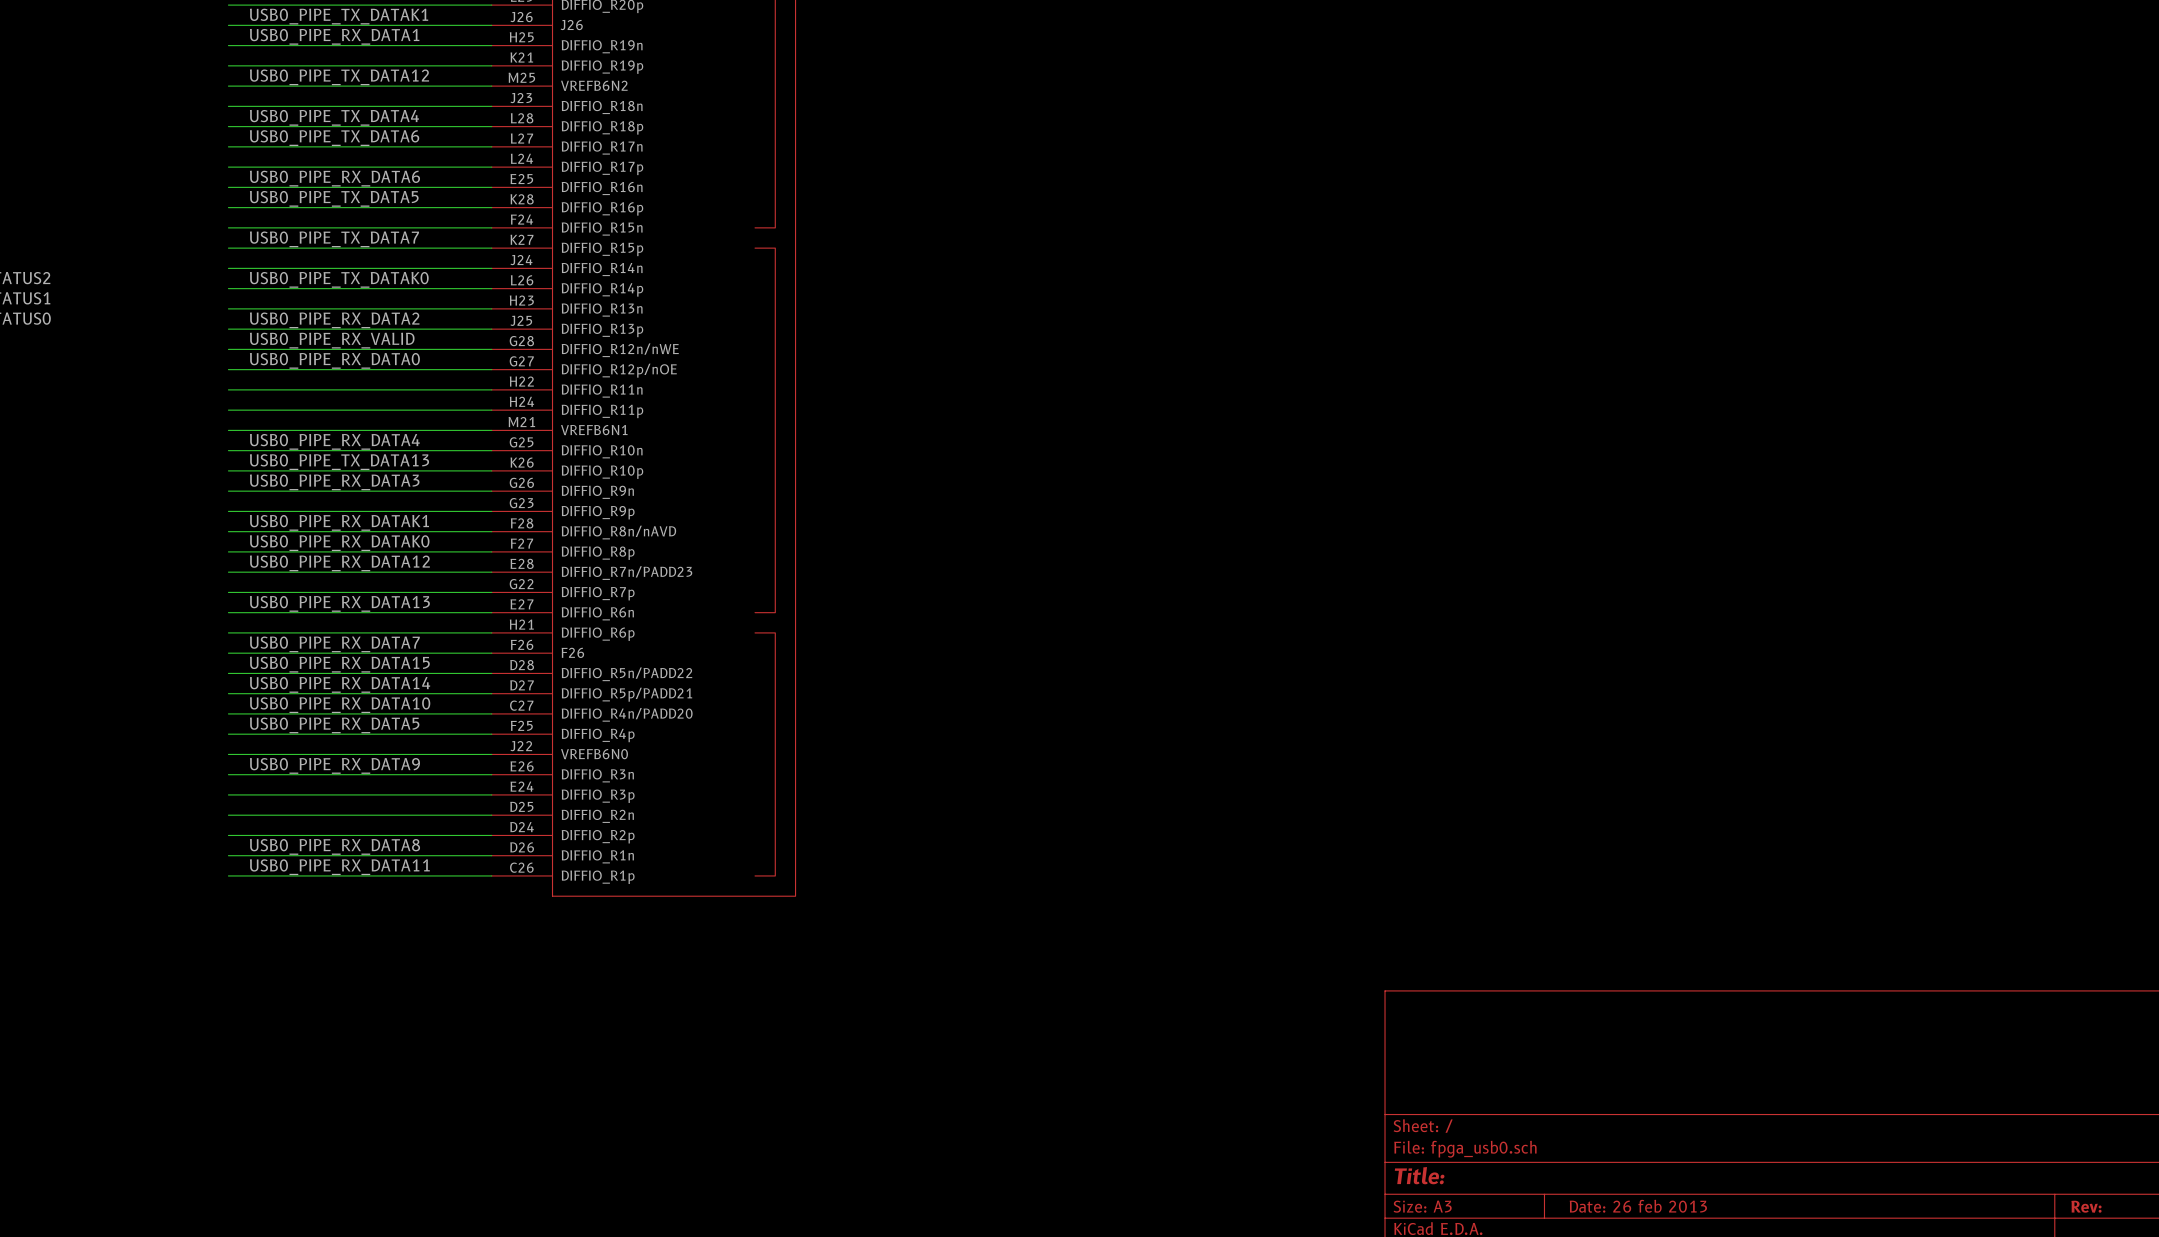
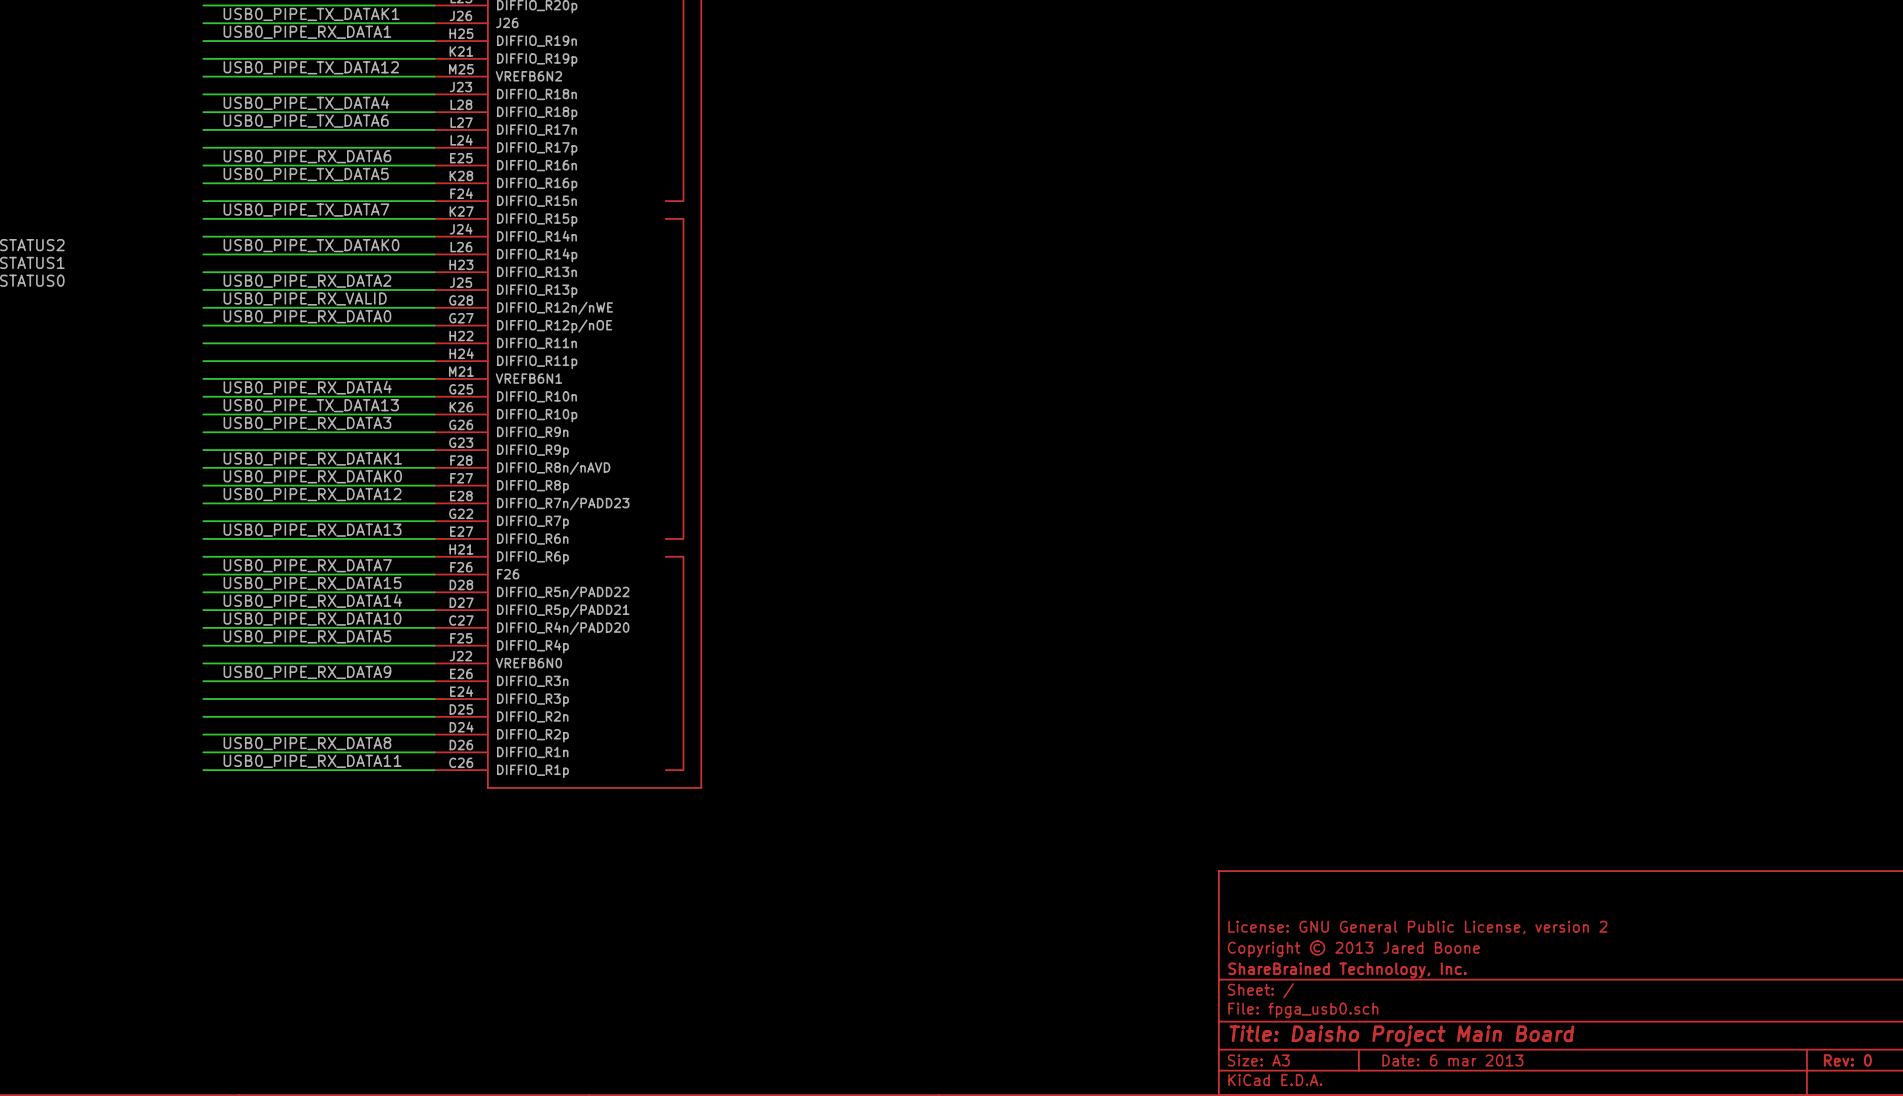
title block: none -> License: GNU General Public License, version 2 (1417, 927)
title block: none -> Copyright © 2013 Jared Boone (1353, 948)
title block: none -> ShareBrained Technology, Inc. (1347, 970)
title block: Title: (1419, 1175) -> Title: Daisho Project Main Board (1401, 1036)
title block: Date: 26 feb 2013 (1638, 1206) -> Date: 6 mar 2013 (1452, 1060)
title block: Rev: (2086, 1206) -> Rev: 0 (1847, 1060)

